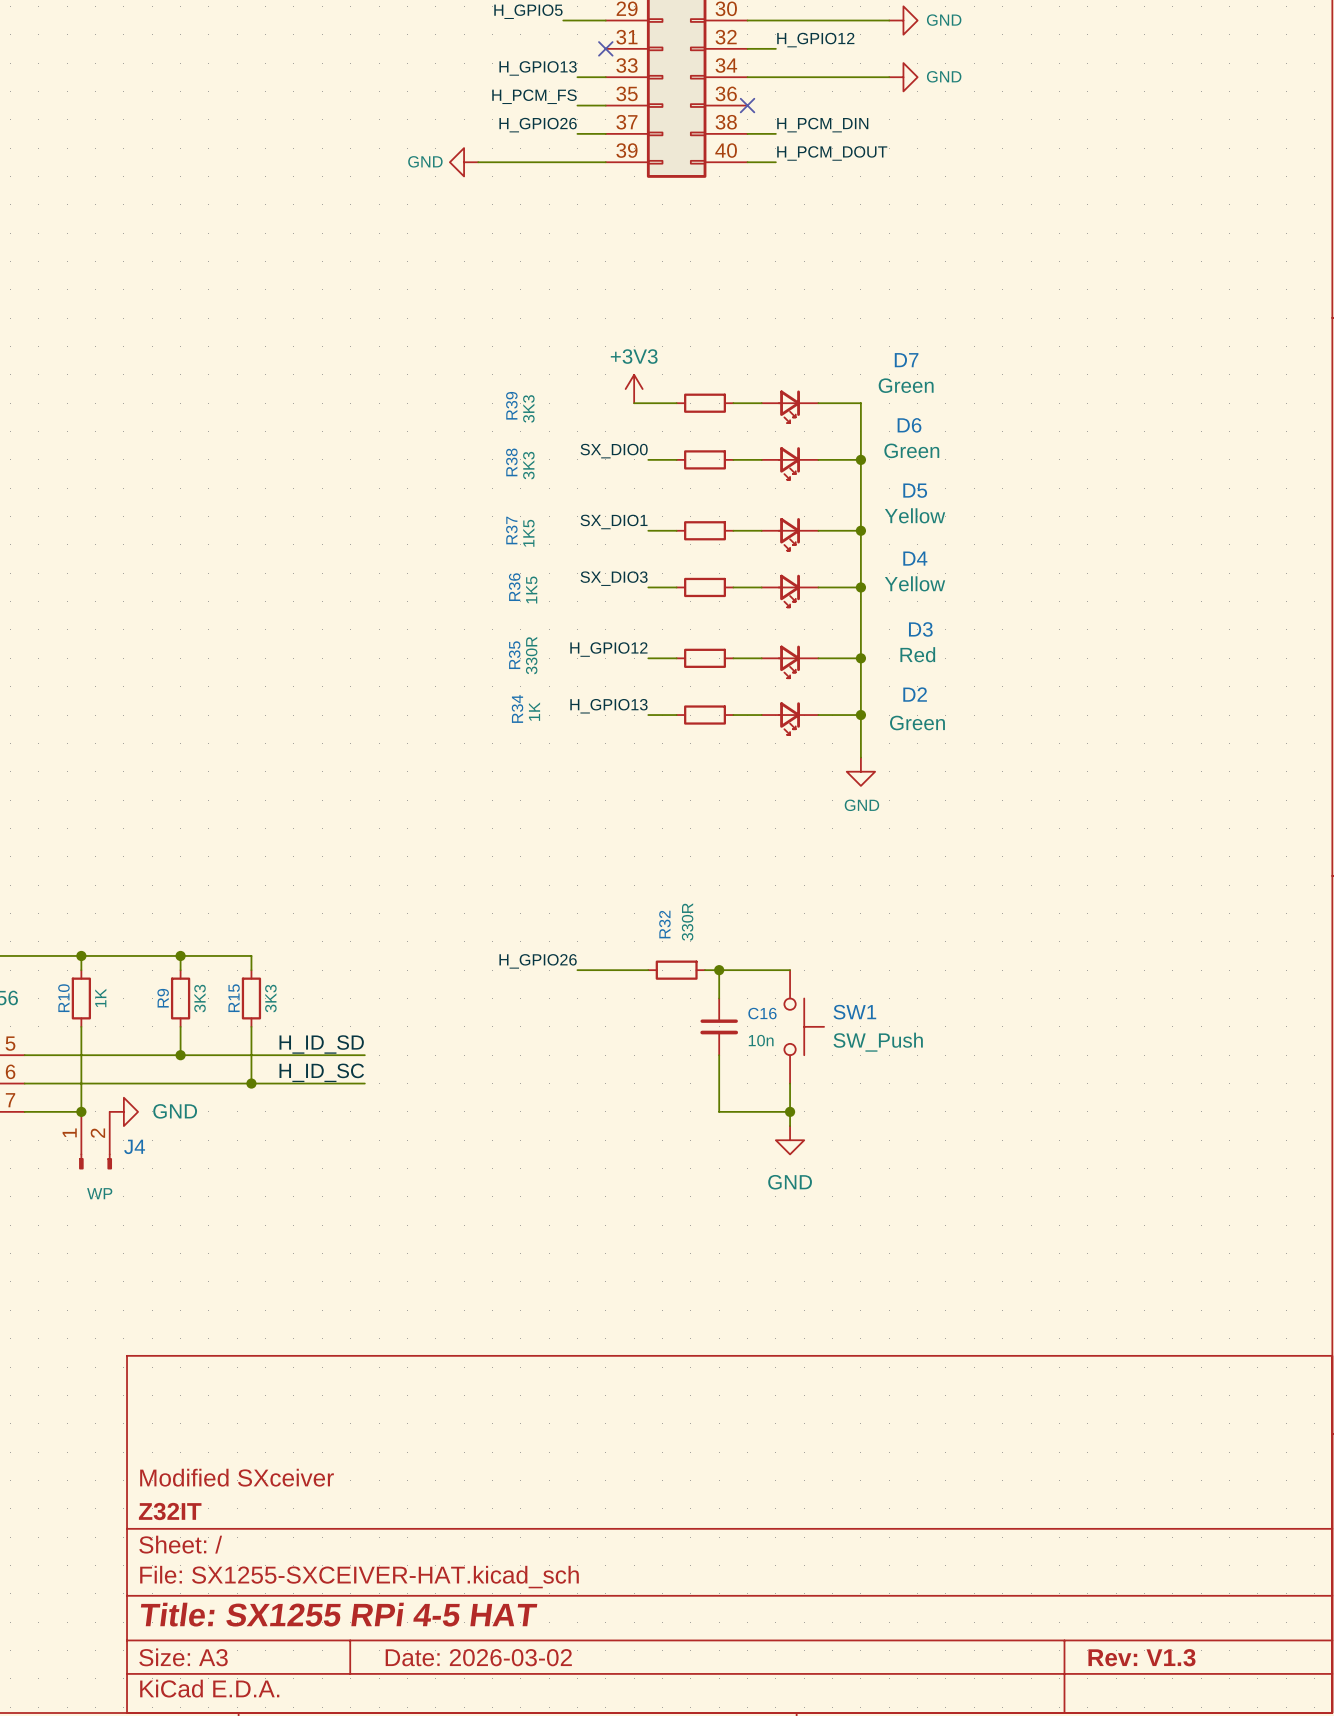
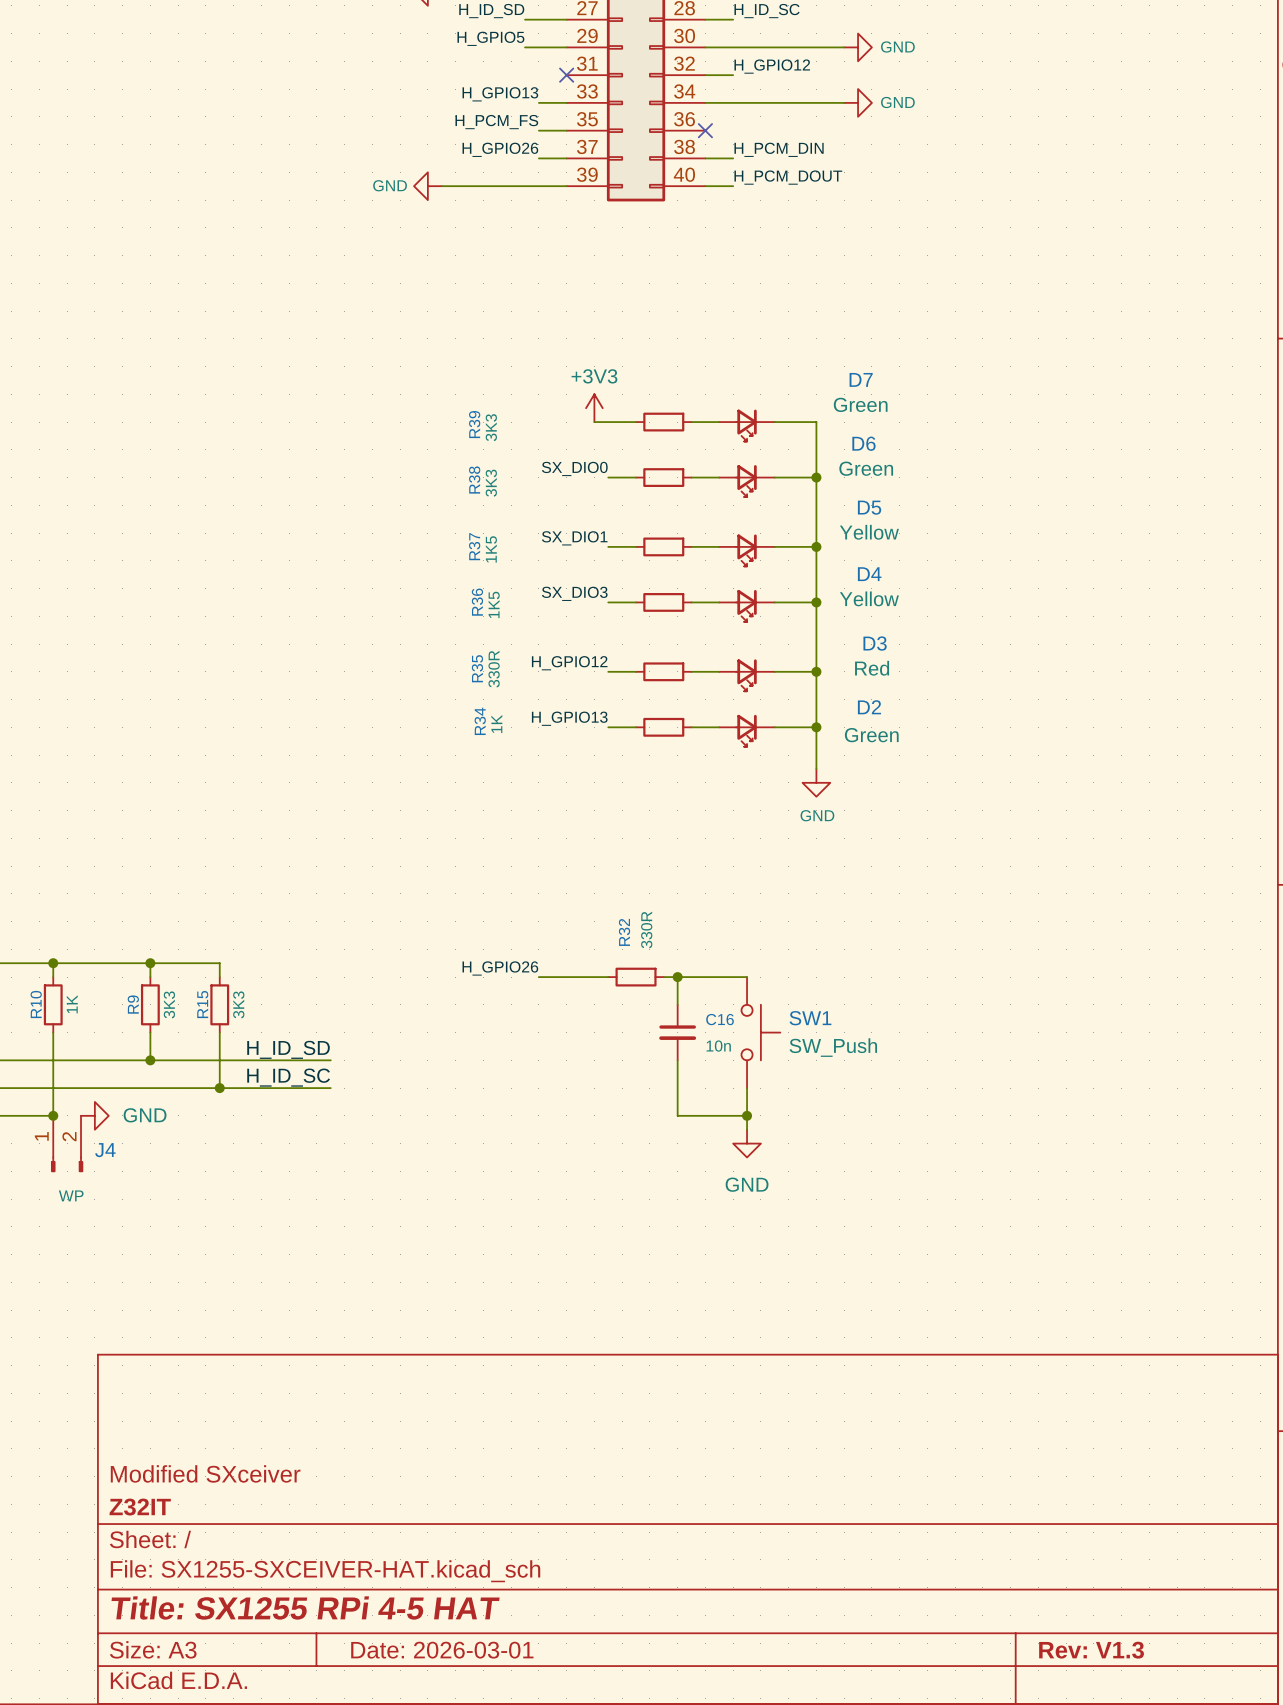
title block: Date: 2026-03-02 (478, 1657) -> Date: 2026-03-01 (442, 1650)

